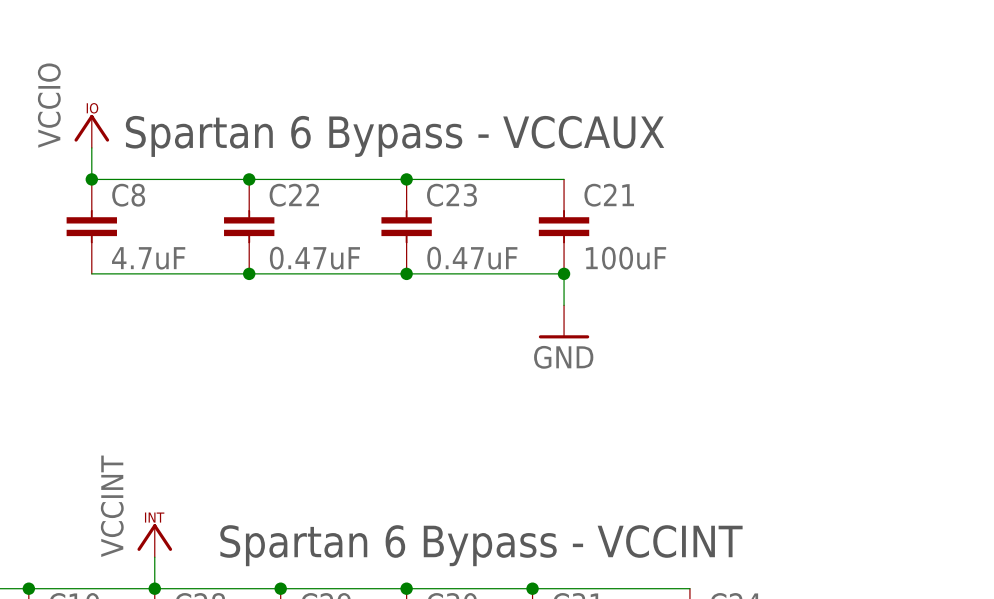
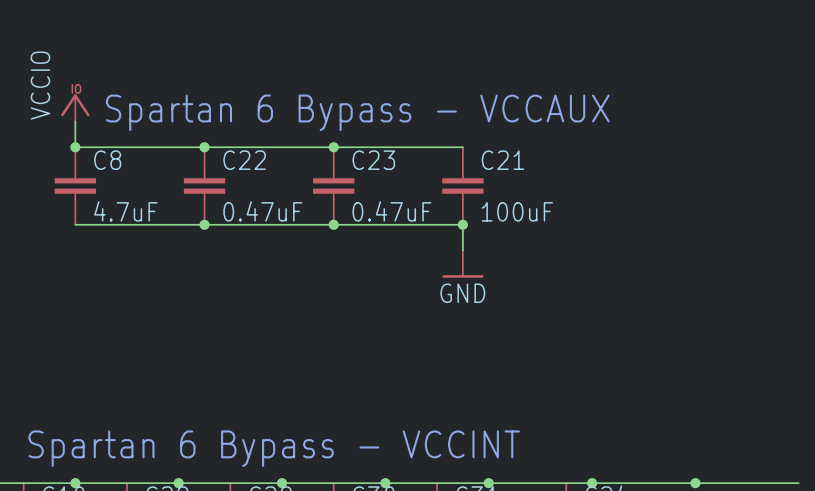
power symbol: VCCINT (154, 540) -> none
text position: Spartan 6 Bypass - VCCINT (481, 545) -> Spartan 6 Bypass - VCCINT (274, 448)
wire: (154, 557) (154, 588) -> none
junction: (28, 588) -> none
junction: none -> (75, 483)
junction: (154, 588) -> none
junction: none -> (178, 483)
junction: (280, 588) -> none
junction: none -> (282, 483)
junction: (406, 588) -> none
junction: none -> (385, 483)
junction: (532, 588) -> none
junction: none -> (488, 483)
wire: none -> (566, 483) (798, 483)
junction: none -> (592, 483)
junction: none -> (695, 483)

